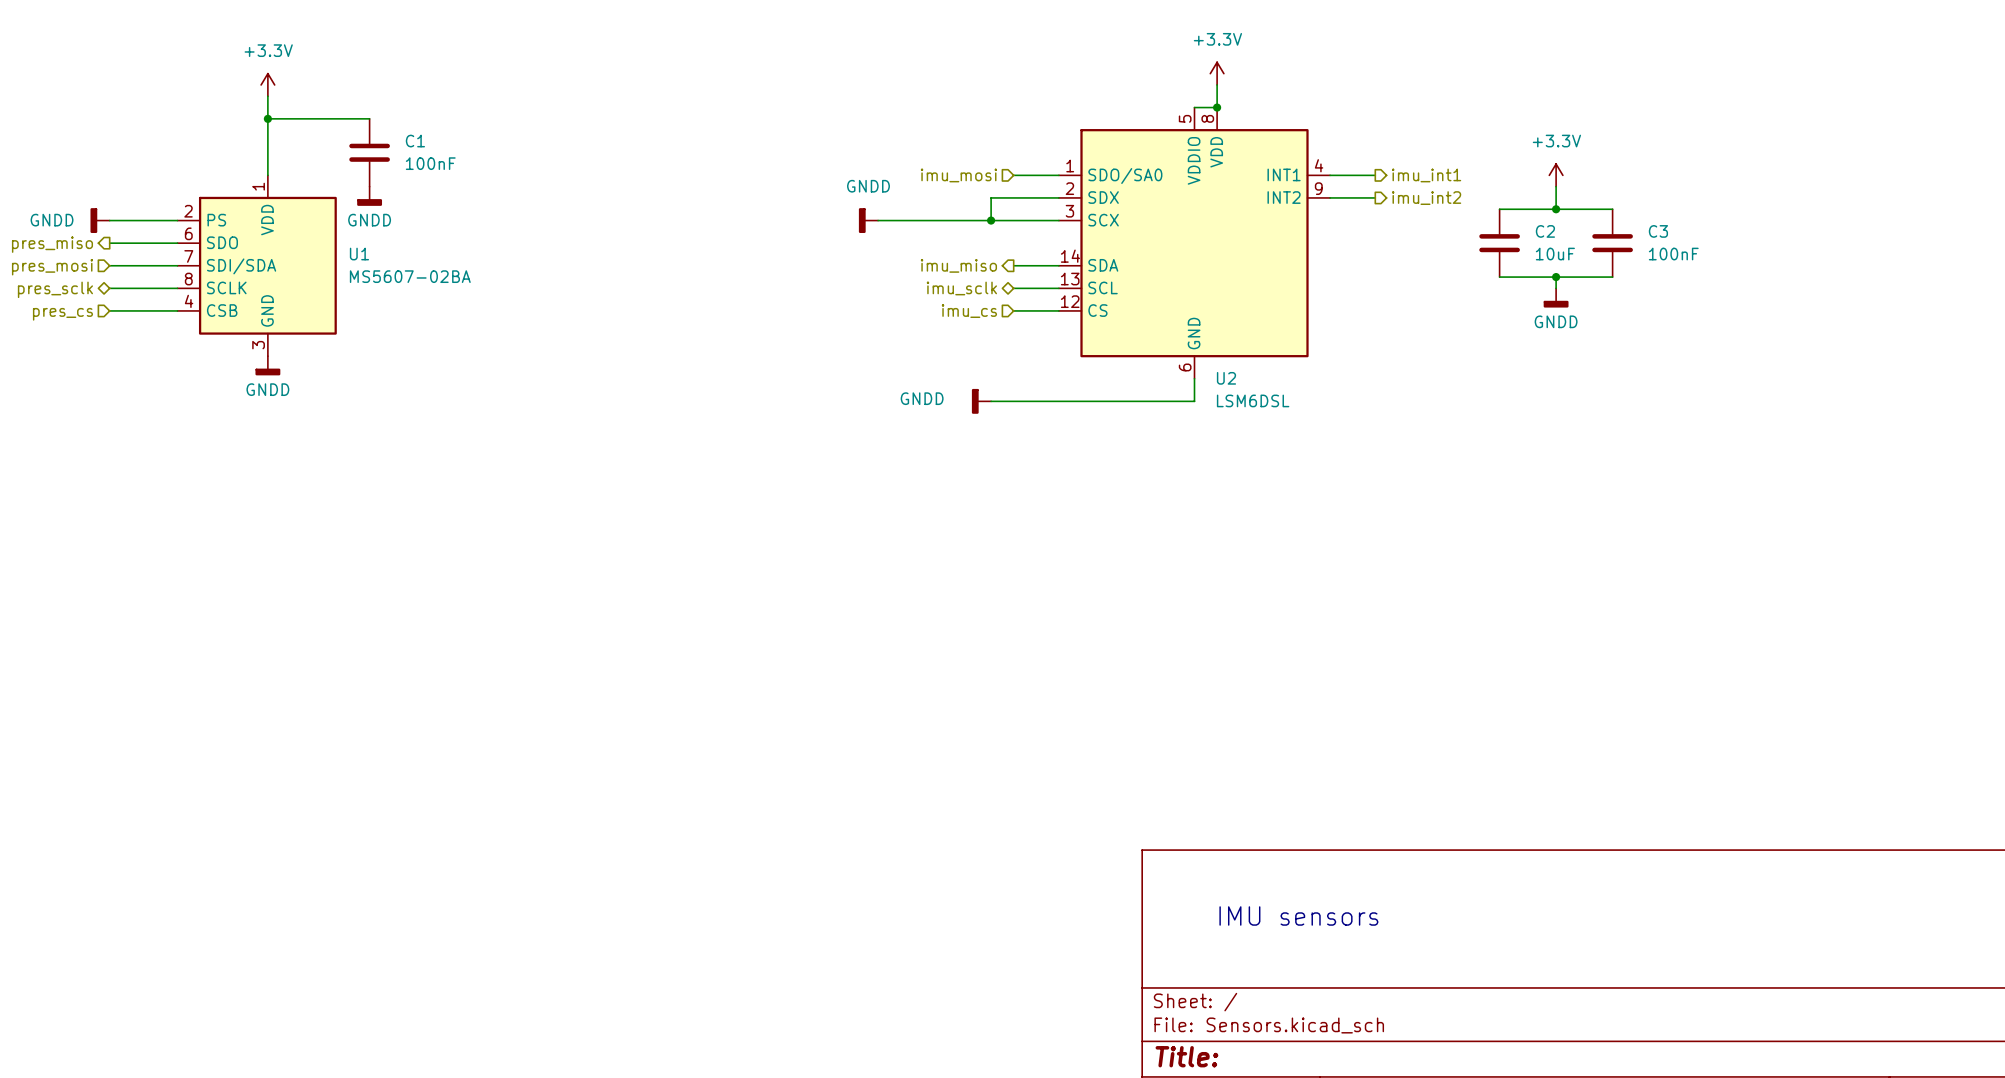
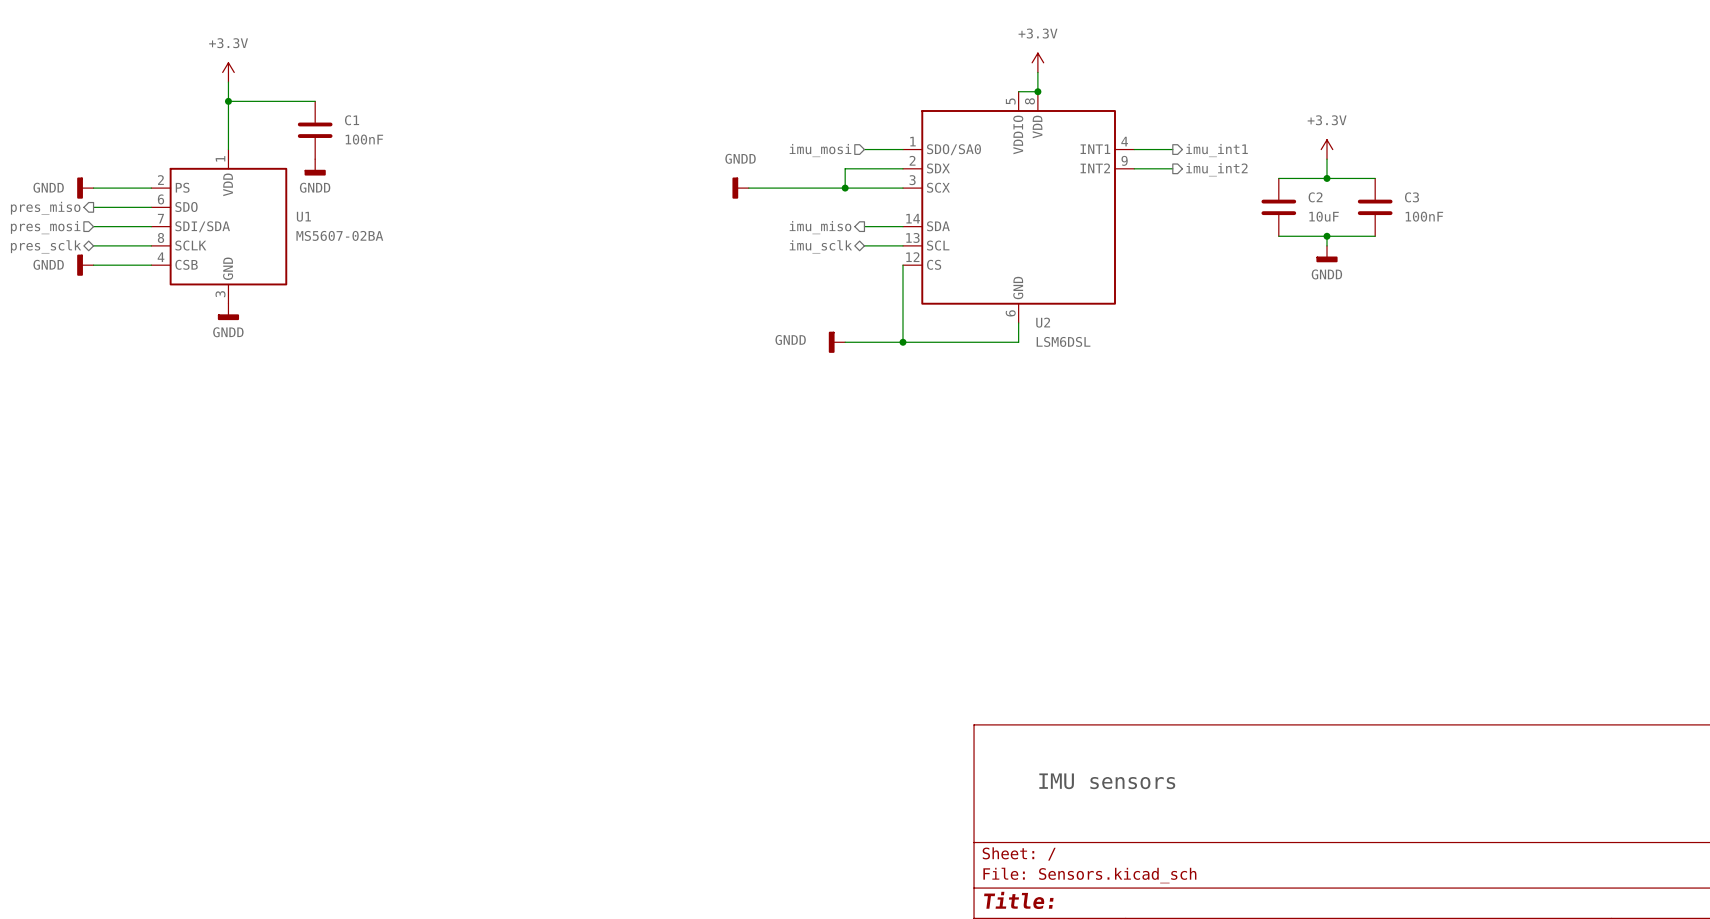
power symbol: none -> GNDD (85, 265)
wire: (1013, 310) (1058, 310) -> (903, 342) (903, 265)
hierarchical label: imu_cs (969, 311) -> none
hierarchical label: pres_cs (62, 314) -> none
junction: none -> (903, 342)

